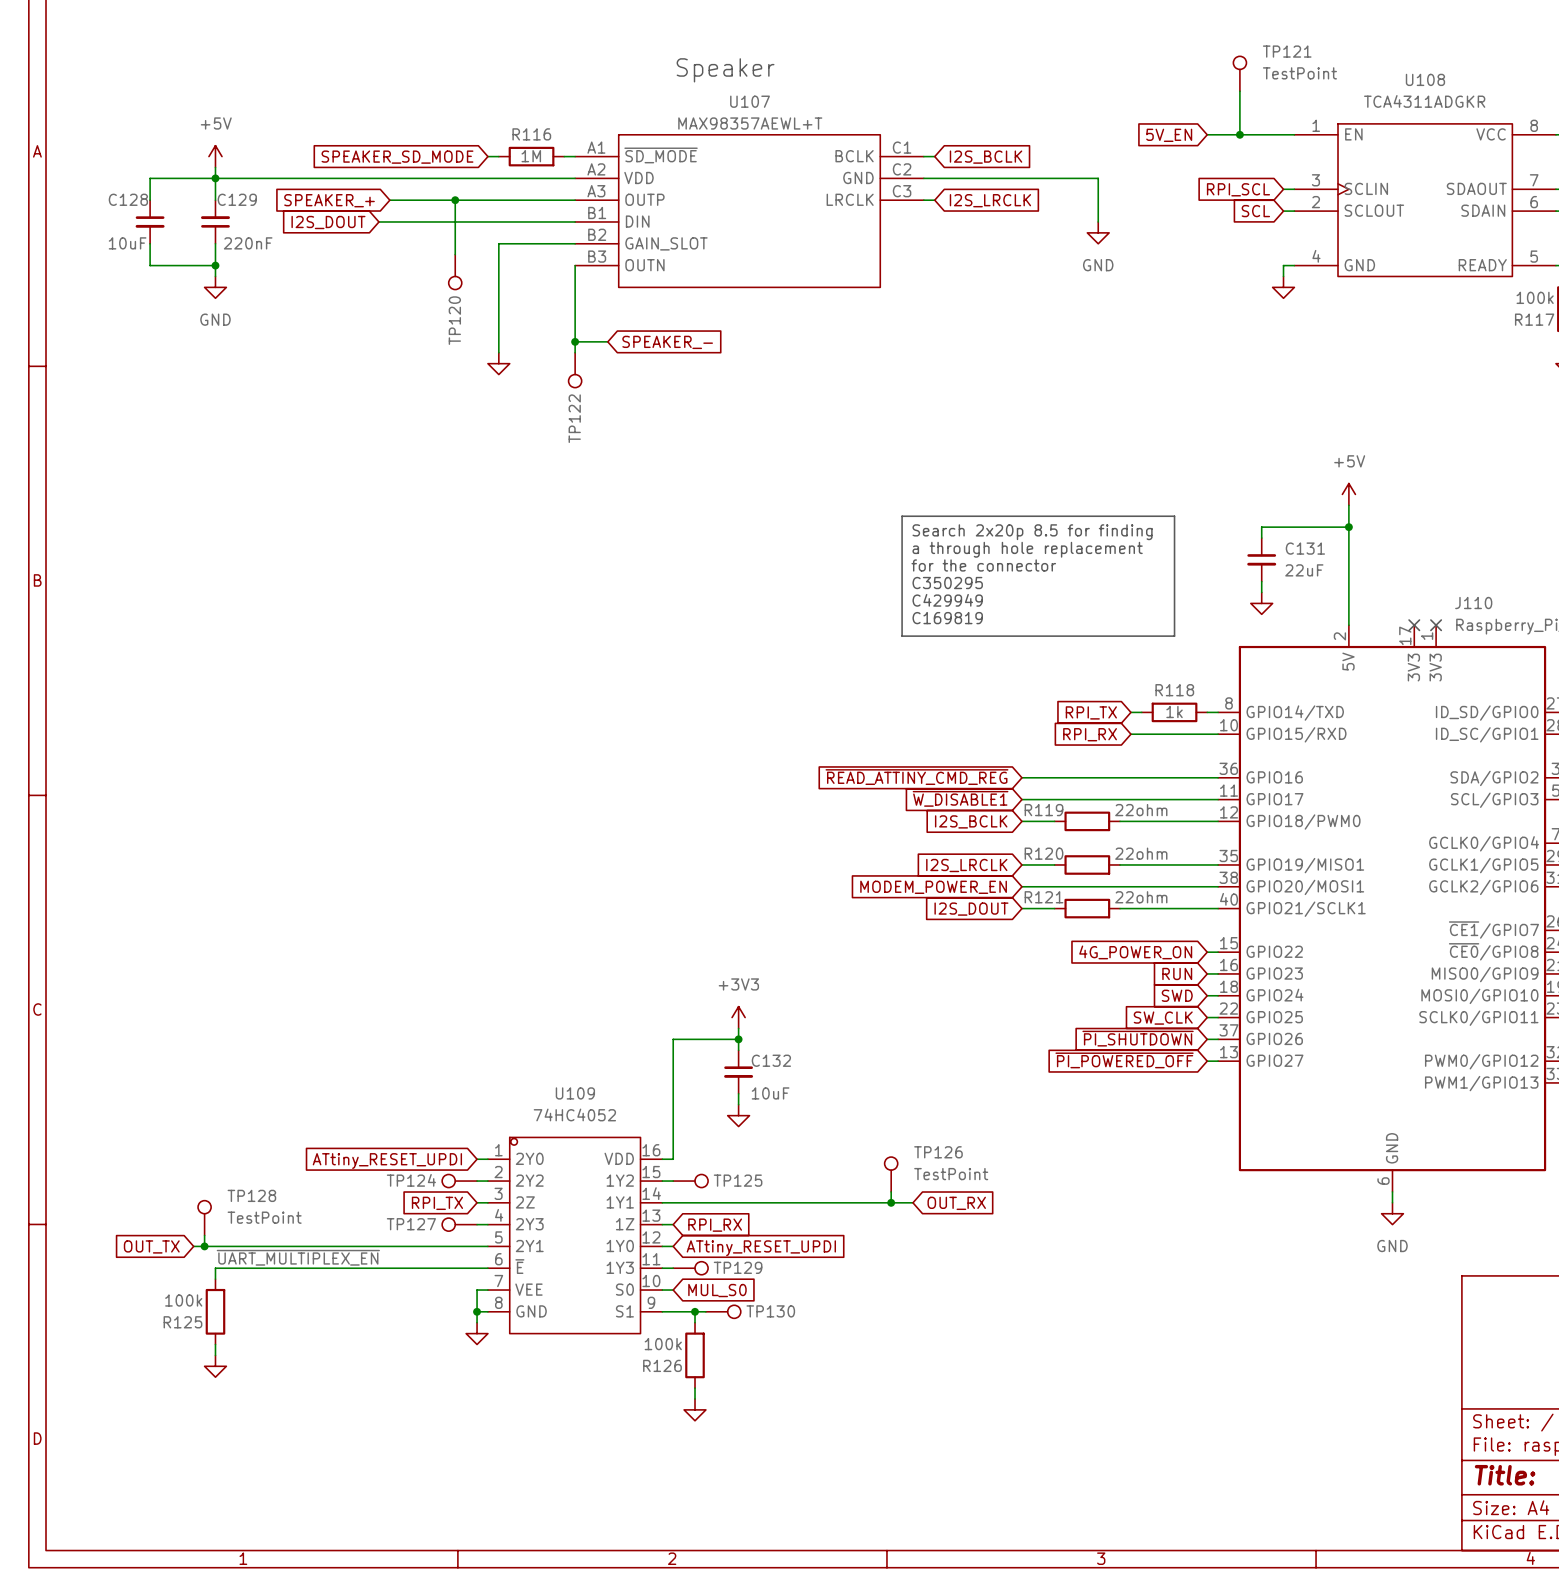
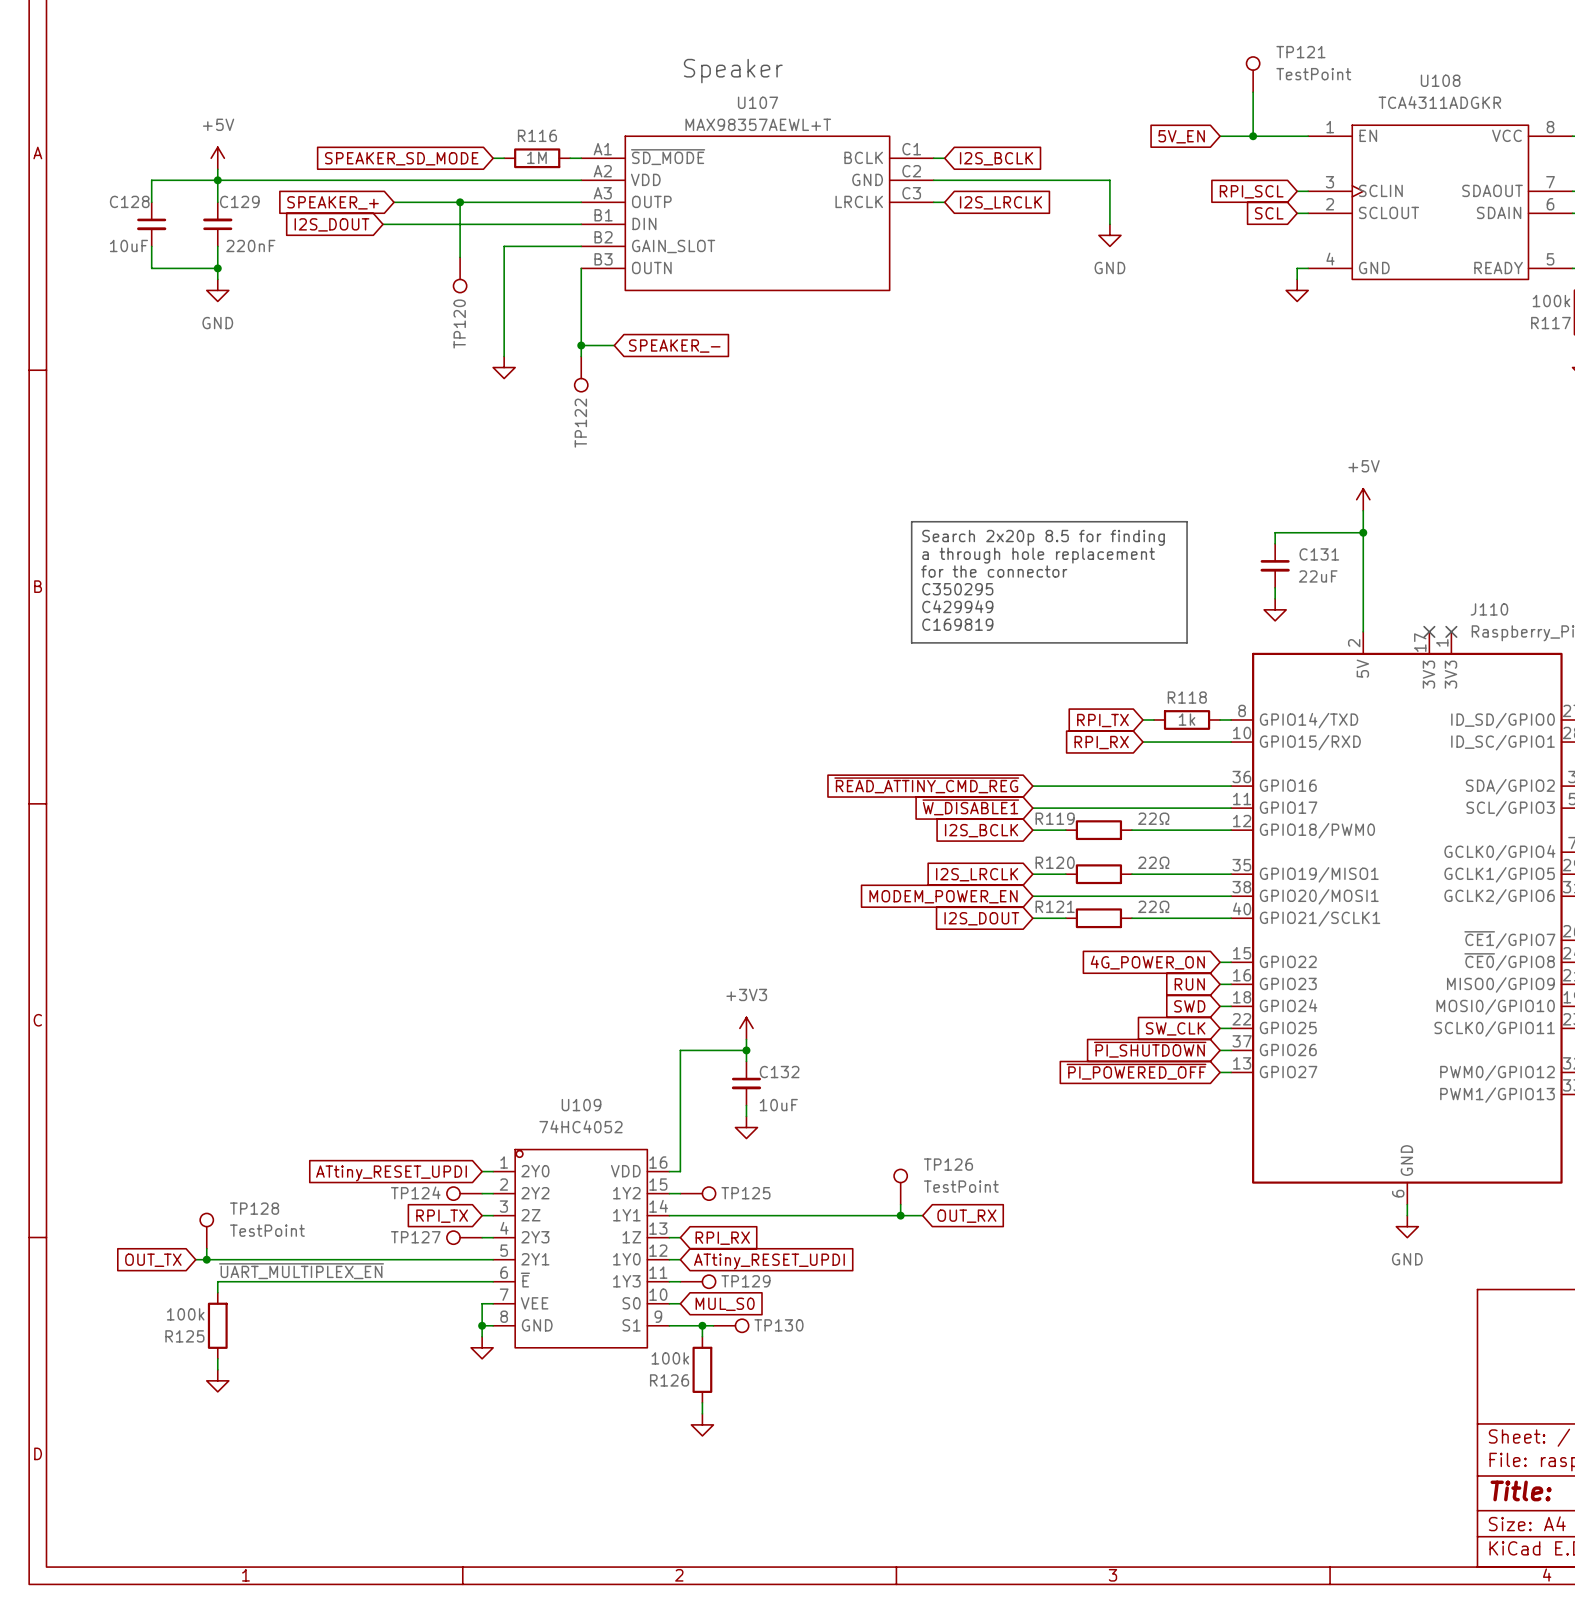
R119 value: 22ohm (1141, 810) -> 22Ω (1153, 818)
R120 value: 22ohm (1141, 853) -> 22Ω (1153, 862)
R121 value: 22ohm (1141, 897) -> 22Ω (1153, 906)

